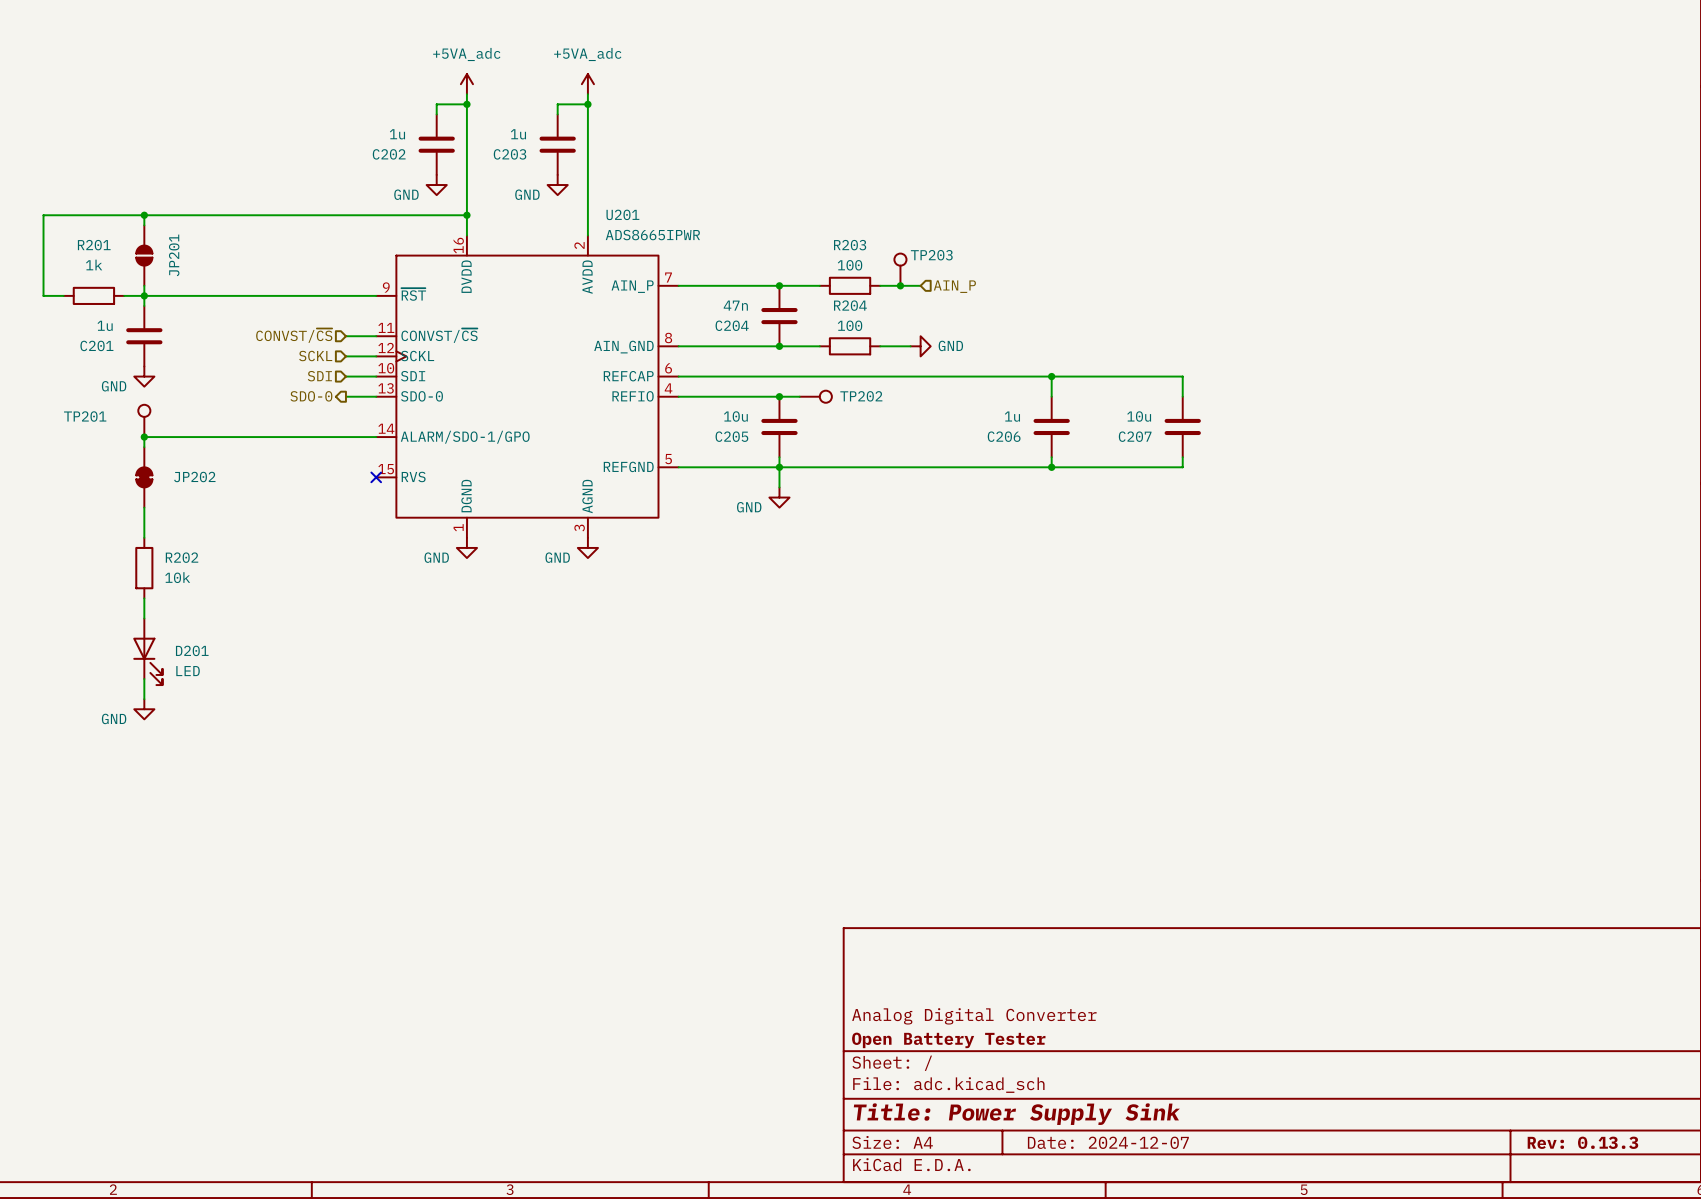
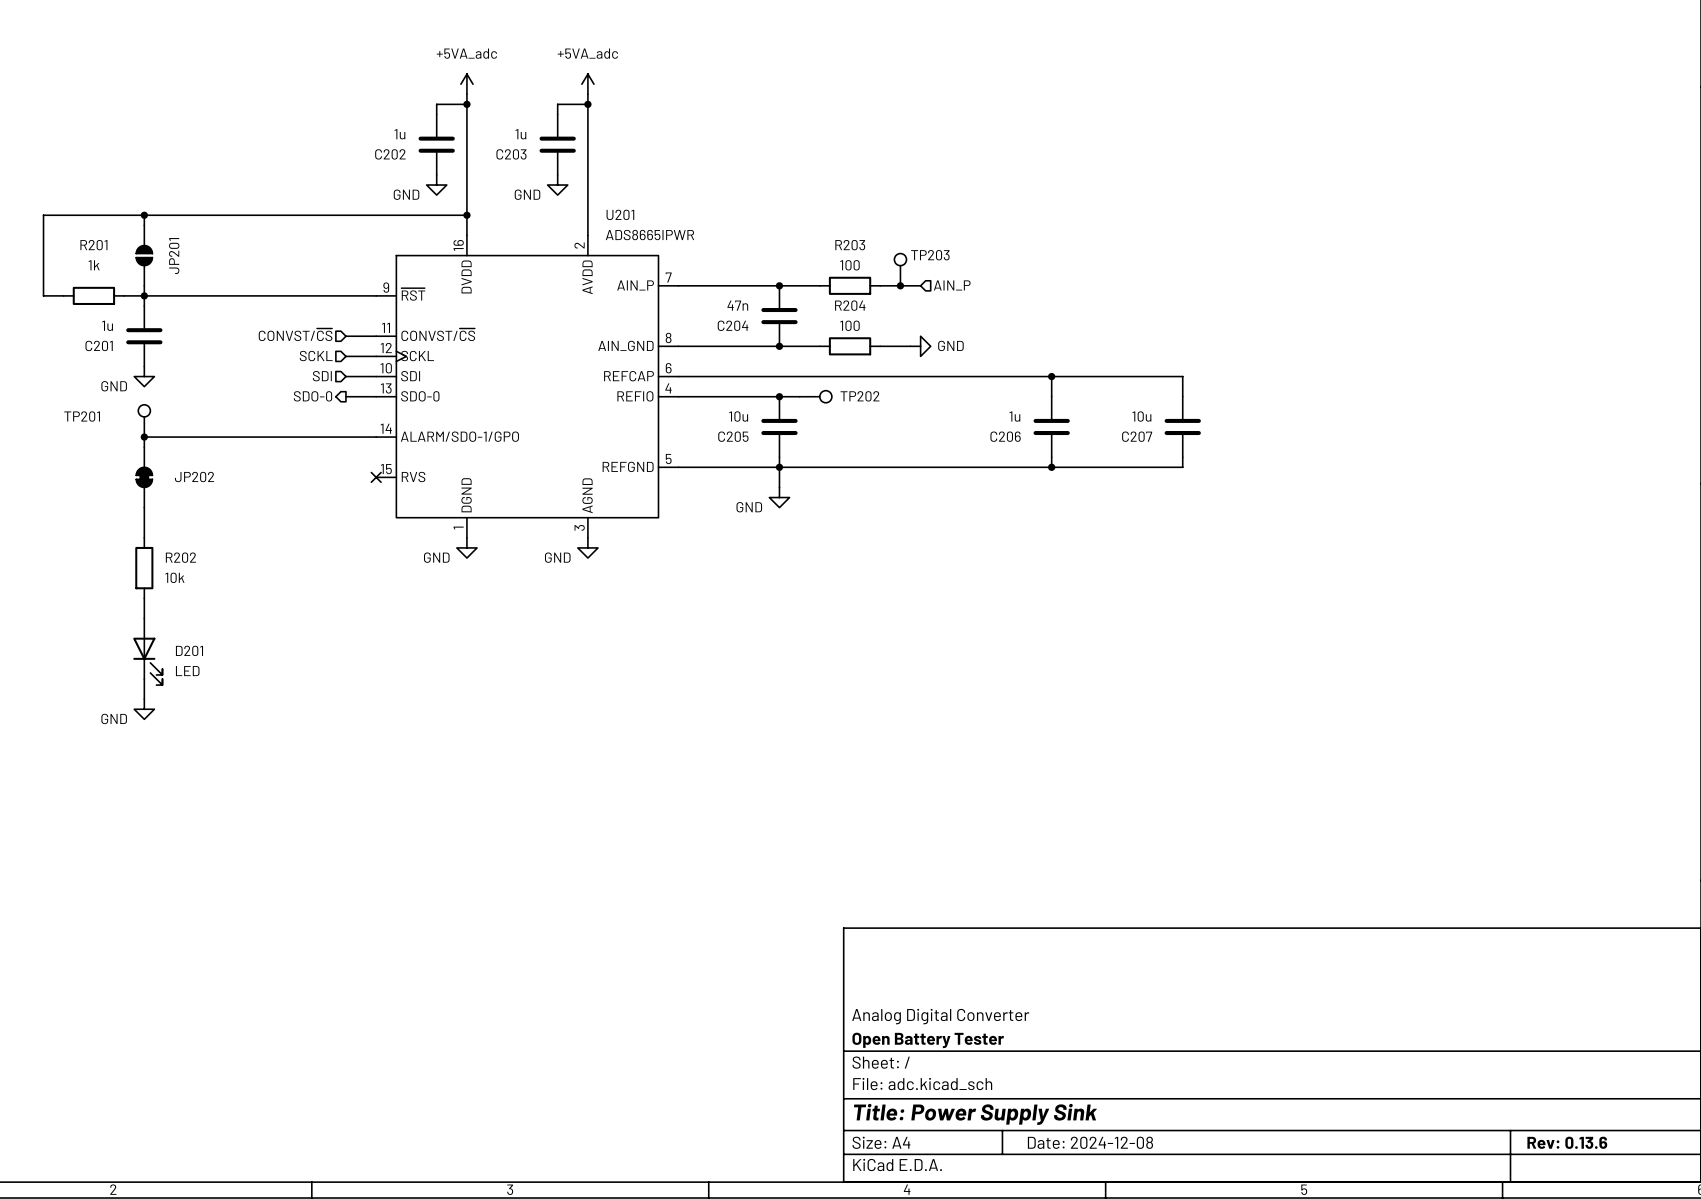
title block: Date: 2024-12-07 (1108, 1142) -> Date: 2024-12-08 (1090, 1142)
title block: Rev: 0.13.3 (1582, 1142) -> Rev: 0.13.6 (1567, 1142)

